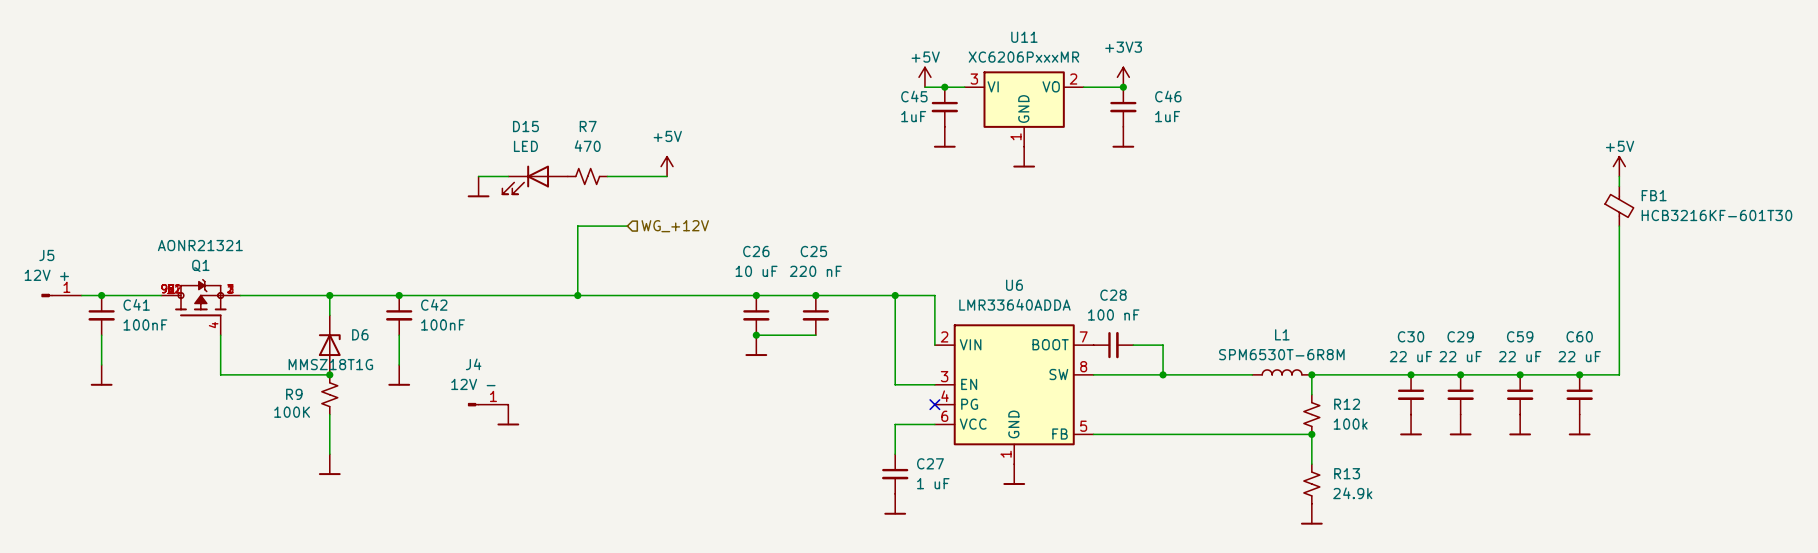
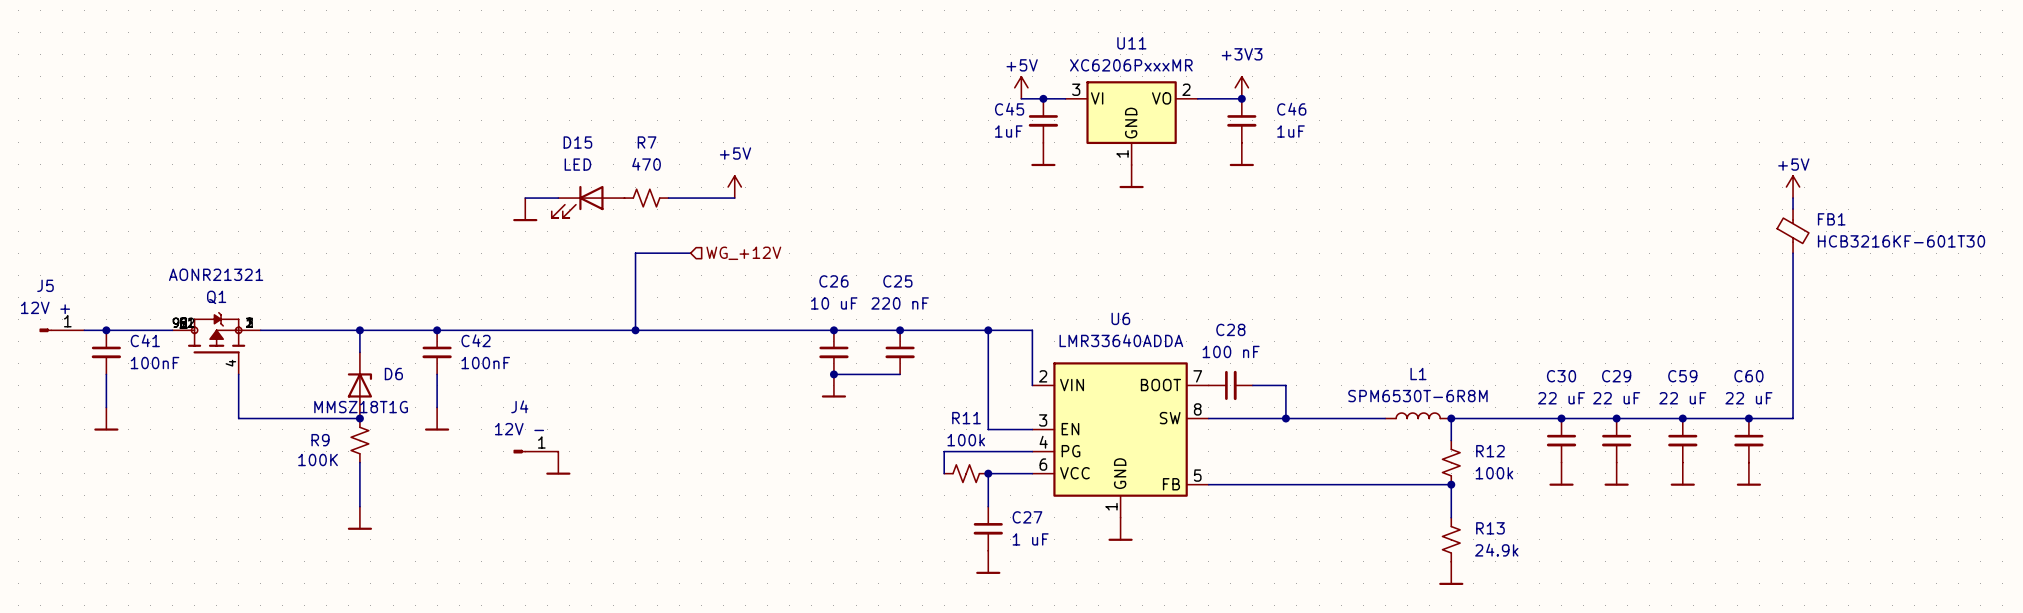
wire: none -> (1032, 451) (944, 451) (944, 473)
no-connect mark: (934, 404) -> none
R11: none -> 100k (966, 473)
junction: none -> (988, 473)

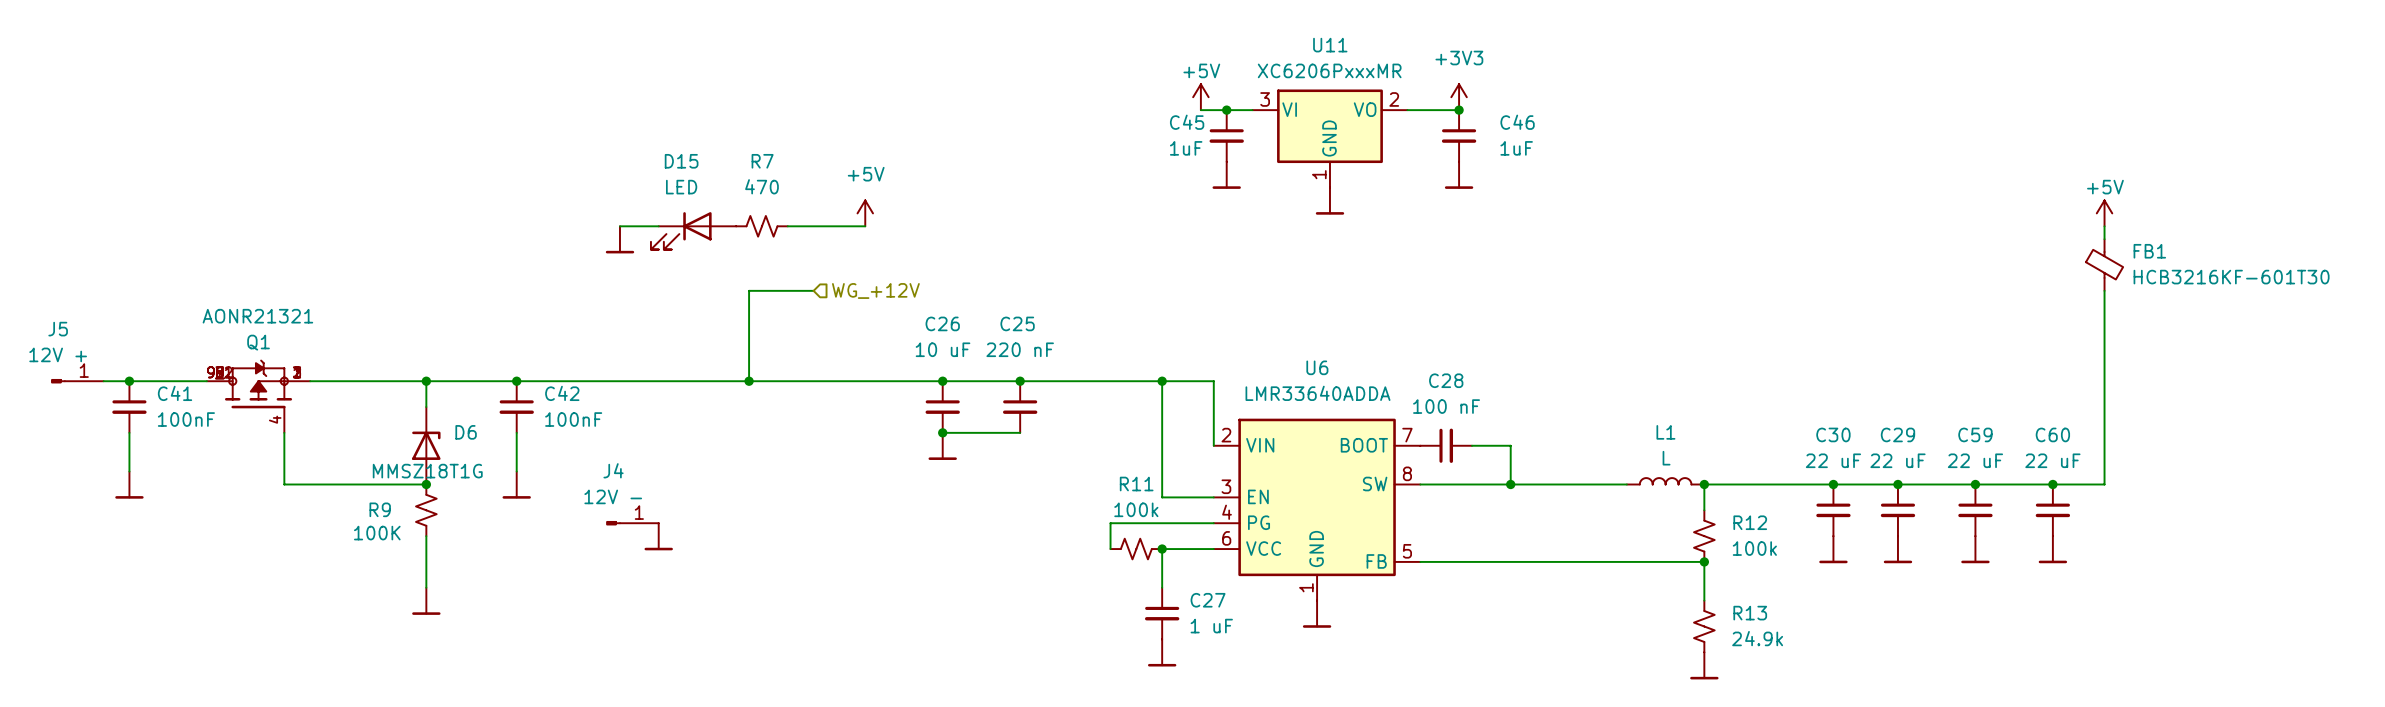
junction: none -> (942, 381)
junction: (833, 330) -> none
junction: none -> (1020, 381)
junction: (900, 330) -> none
C26 position: (833, 352) -> (942, 407)
C25 position: (900, 352) -> (1020, 407)
junction: none -> (942, 432)
junction: (833, 374) -> none
wire: (867, 374) (900, 374) -> (942, 432) (981, 432)
power symbol position: (833, 386) -> (942, 446)
L1 value: SPM6530T-6R8M (1417, 396) -> L (1666, 458)

